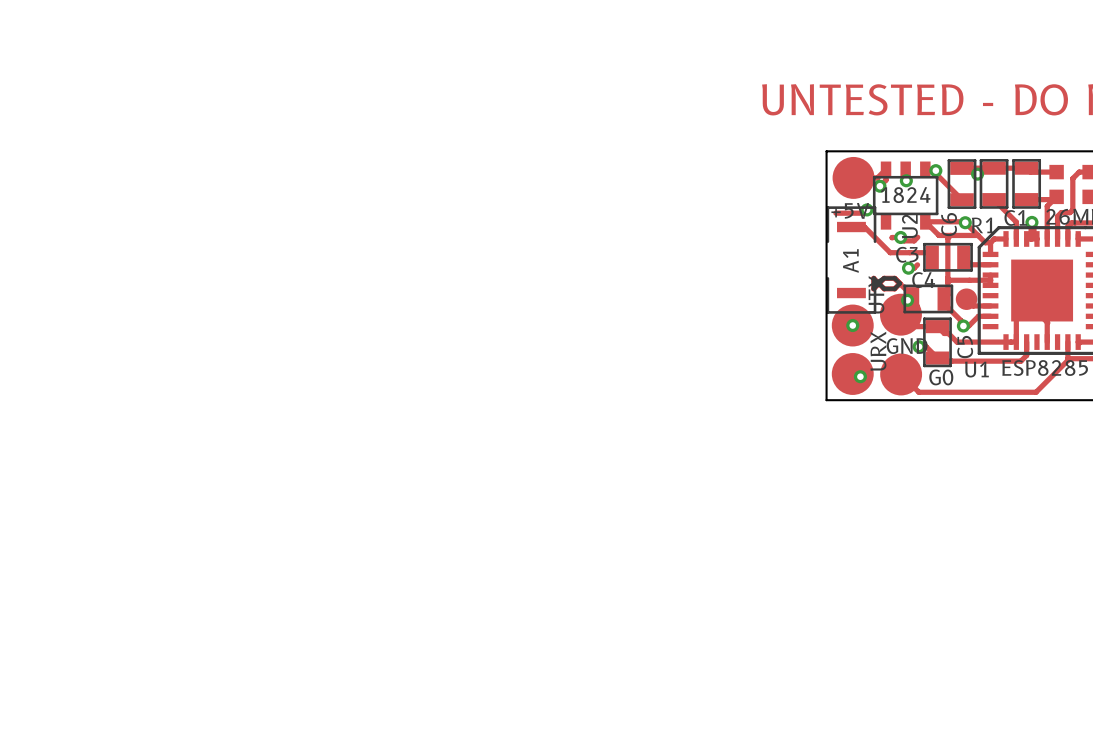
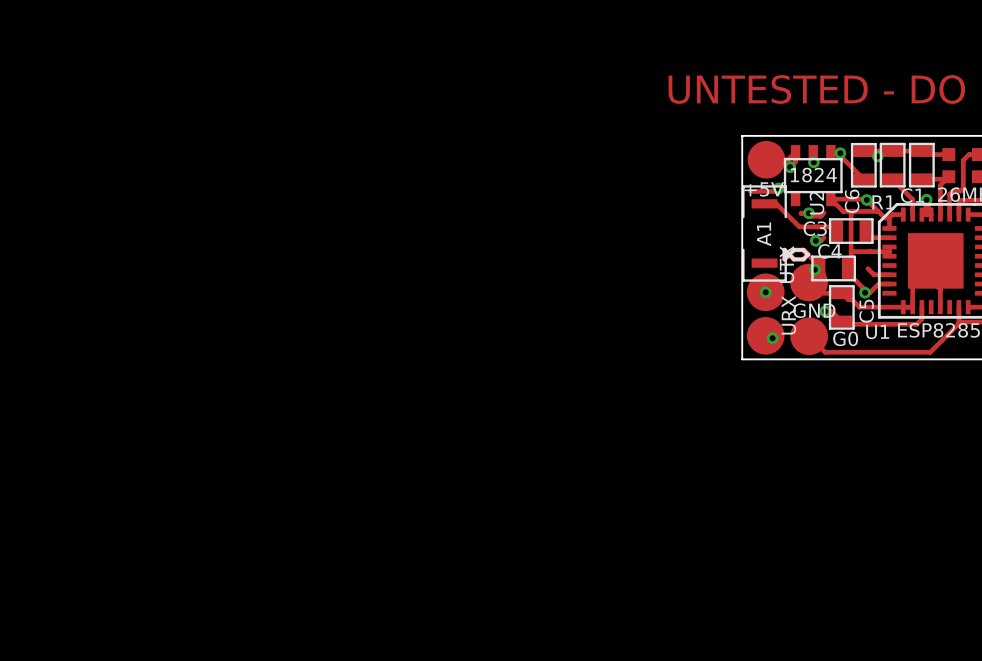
part: (966, 299) -> none

